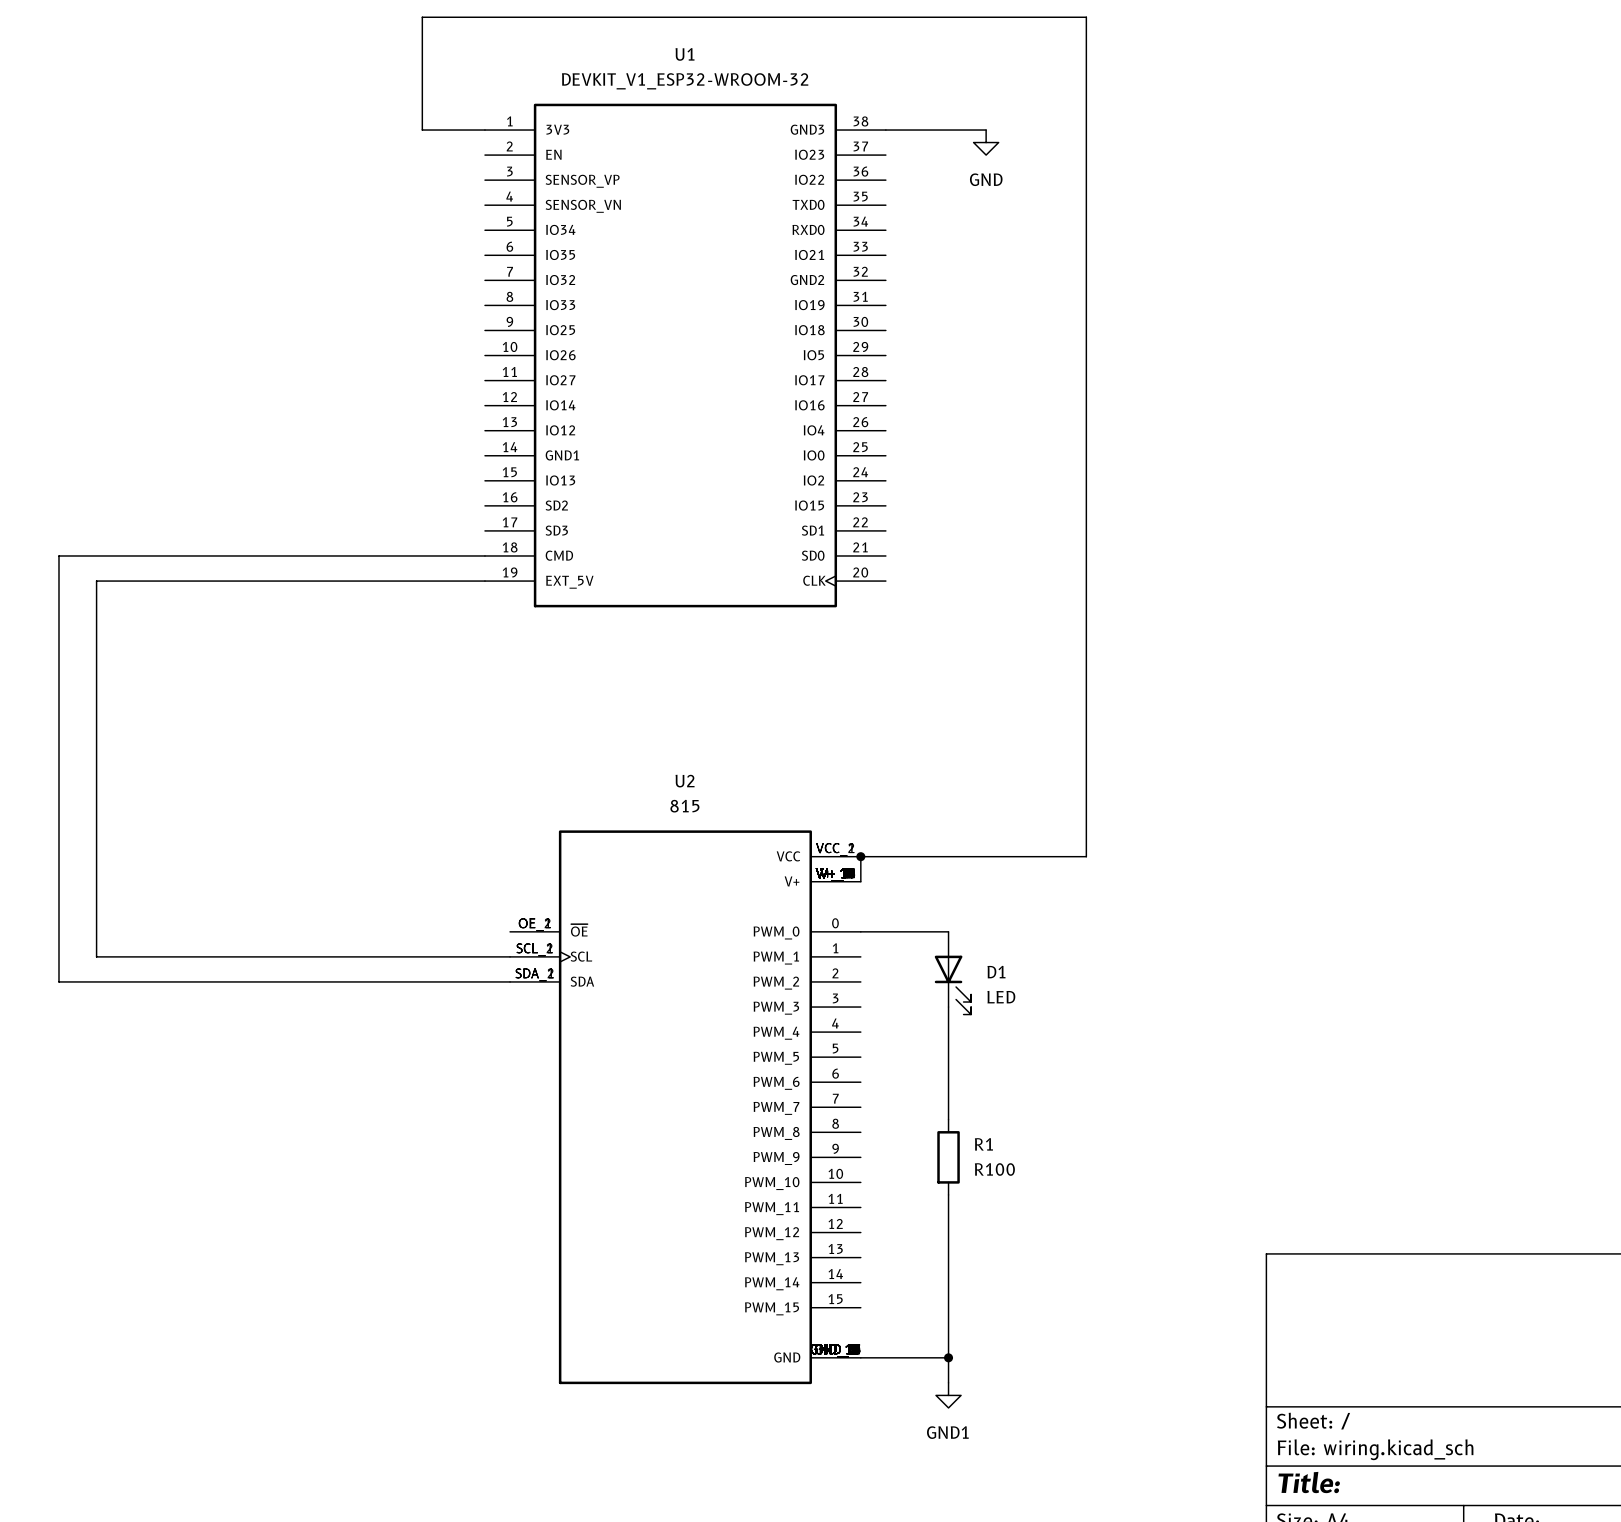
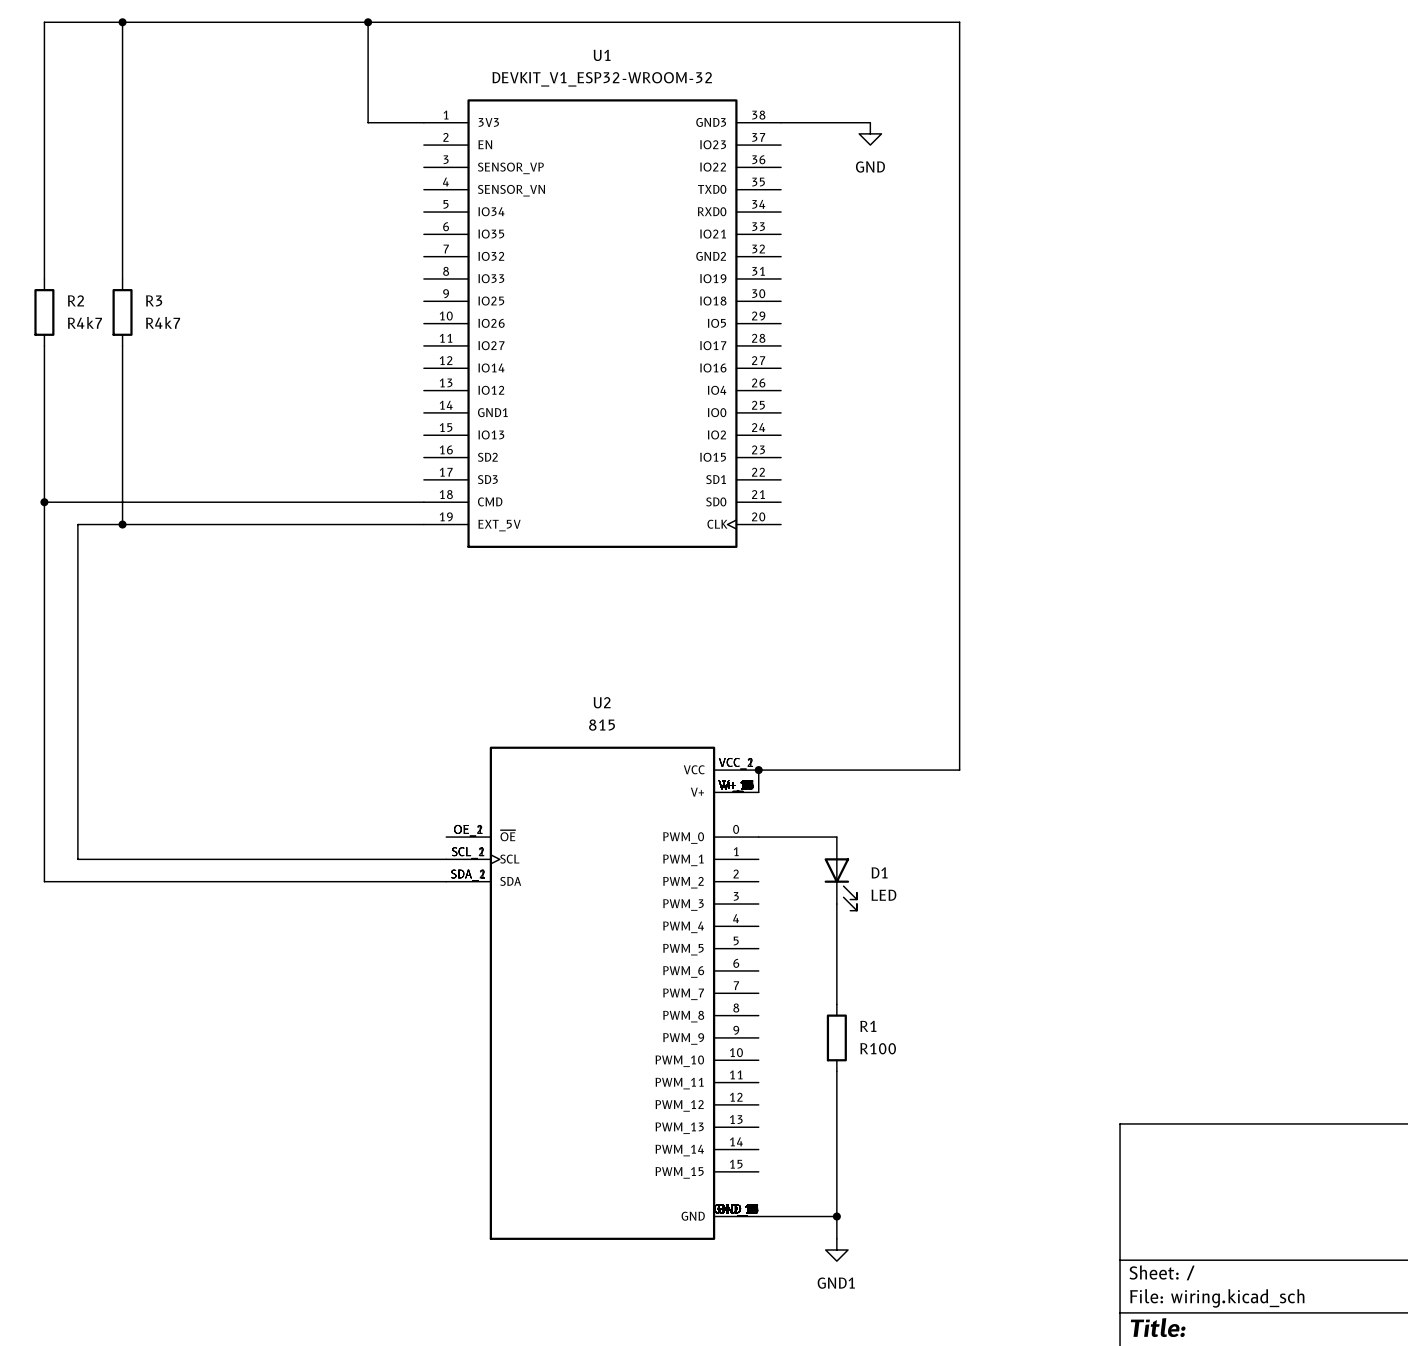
wire: none -> (122, 22) (122, 278)
junction: none -> (122, 22)
wire: none -> (368, 22) (44, 22) (44, 278)
junction: none -> (368, 22)
R2: none -> R4k7 (44, 312)
R3: none -> R4k7 (122, 312)
wire: none -> (44, 345) (44, 502)
wire: none -> (122, 345) (122, 524)
junction: none -> (44, 502)
junction: none -> (122, 524)

